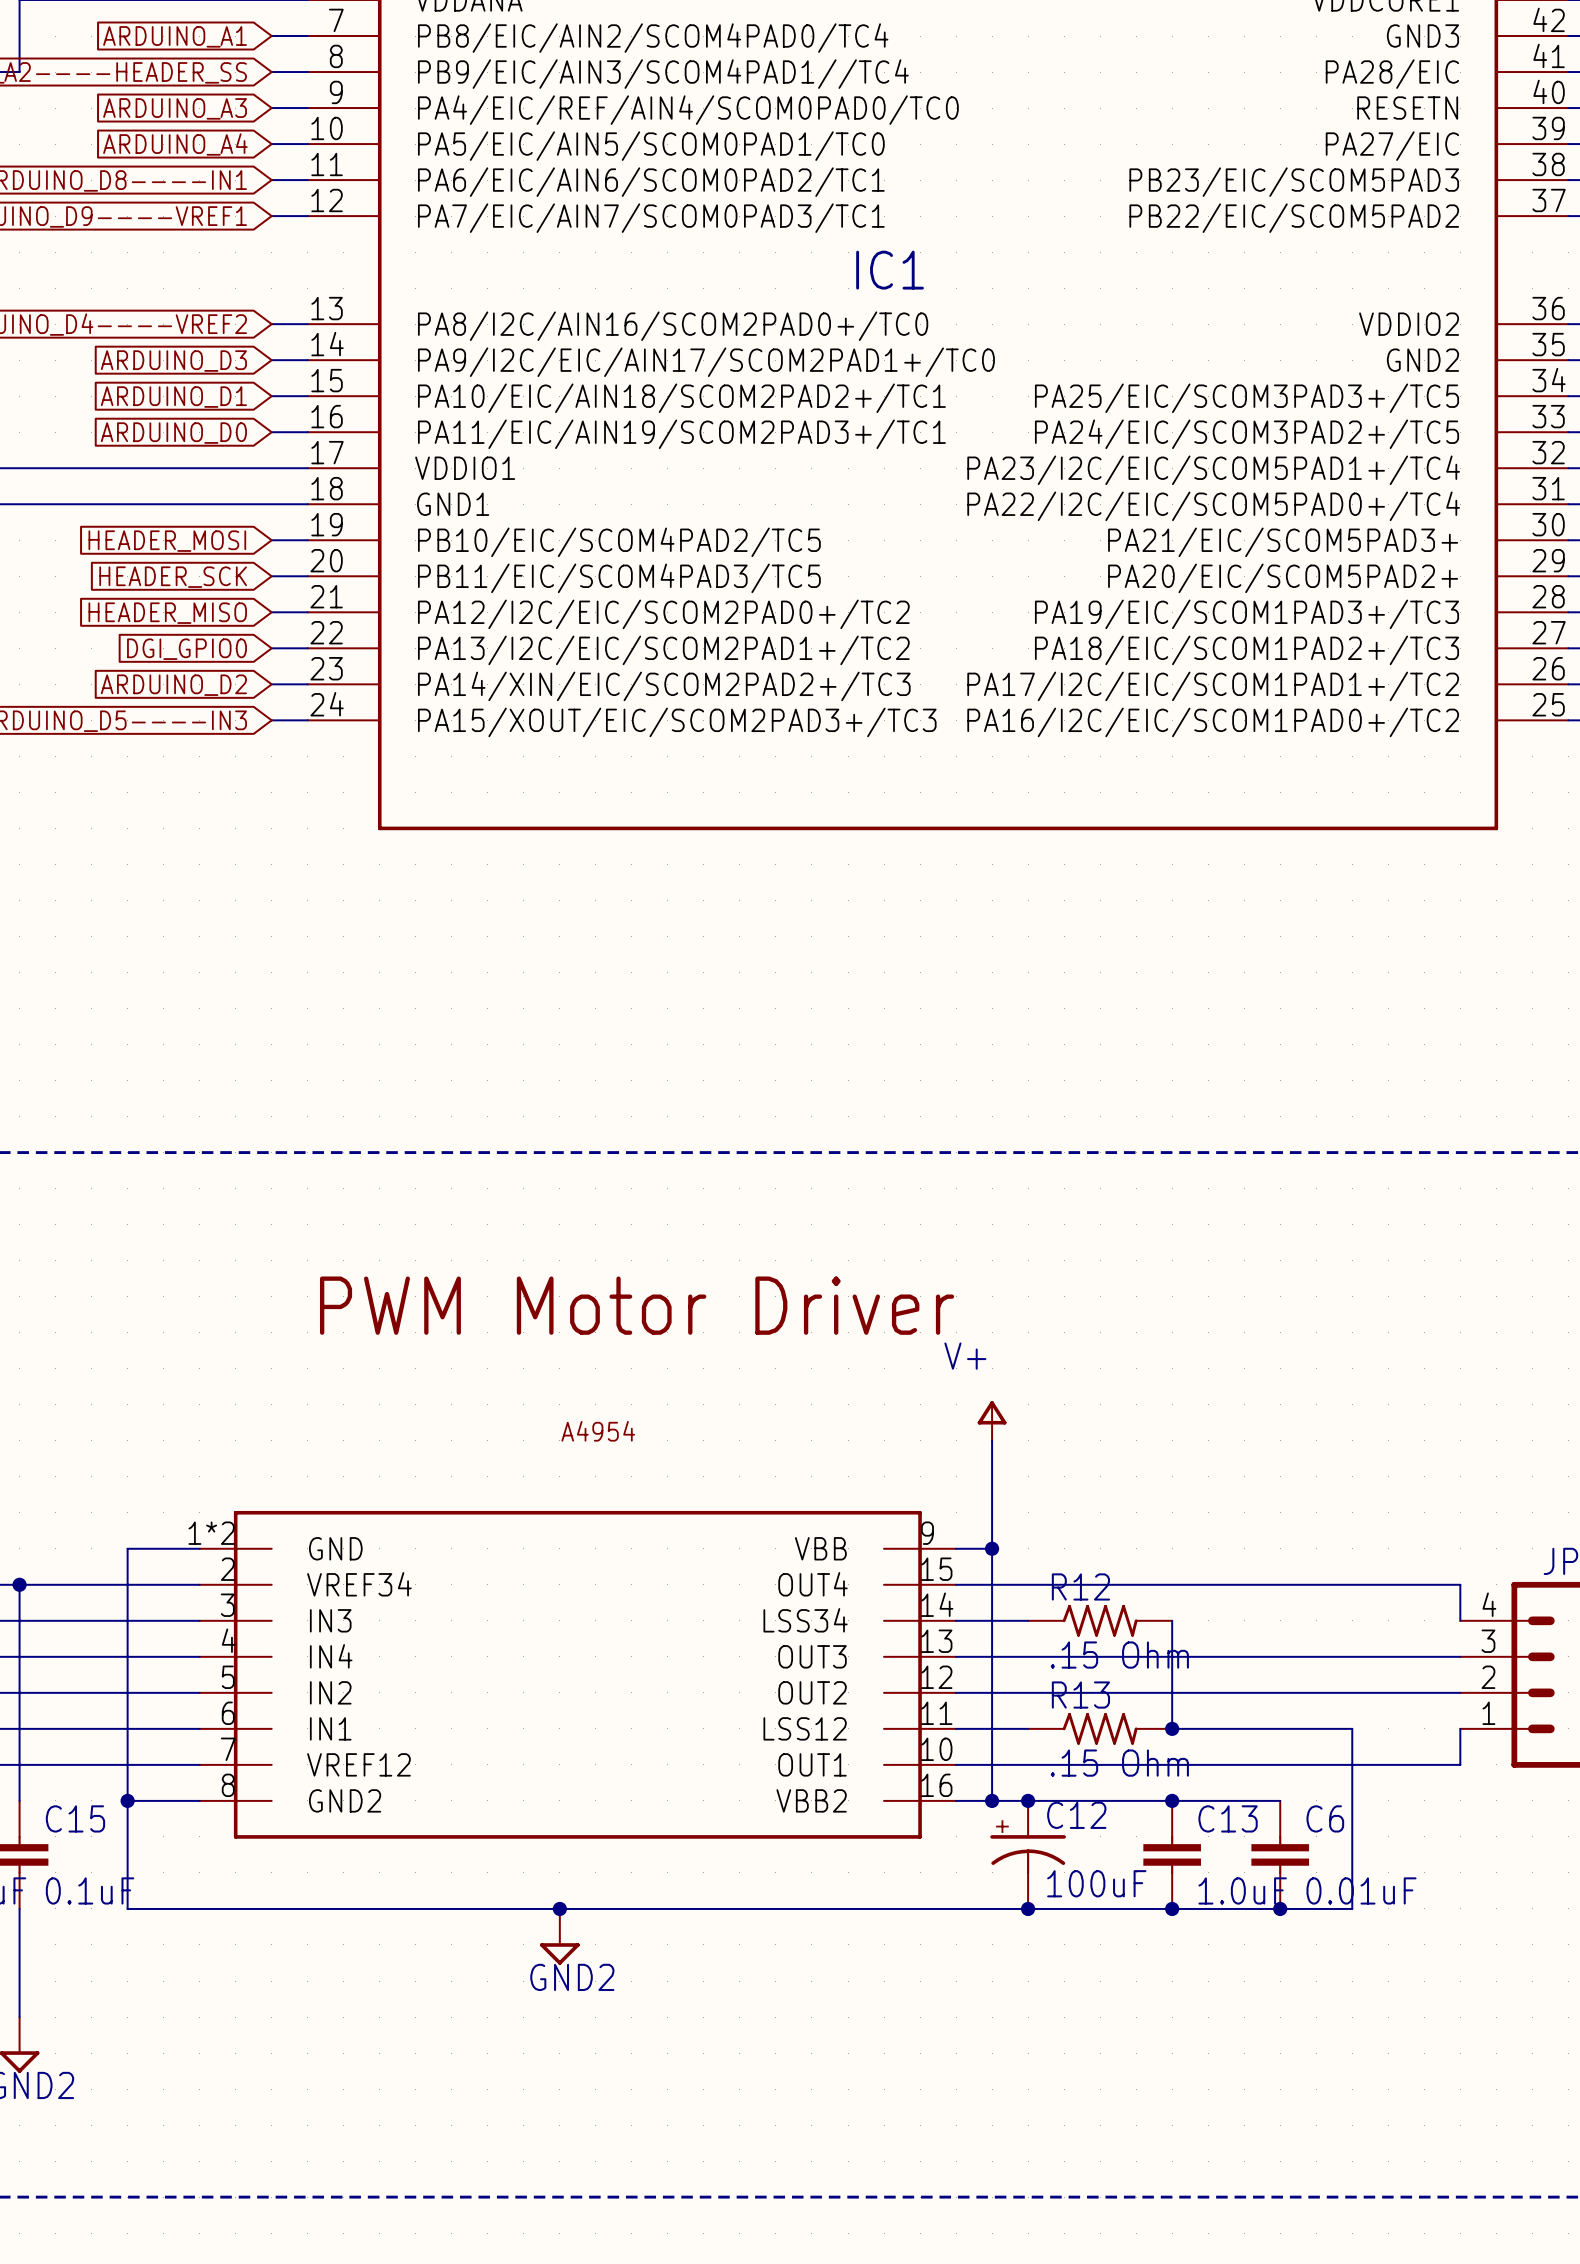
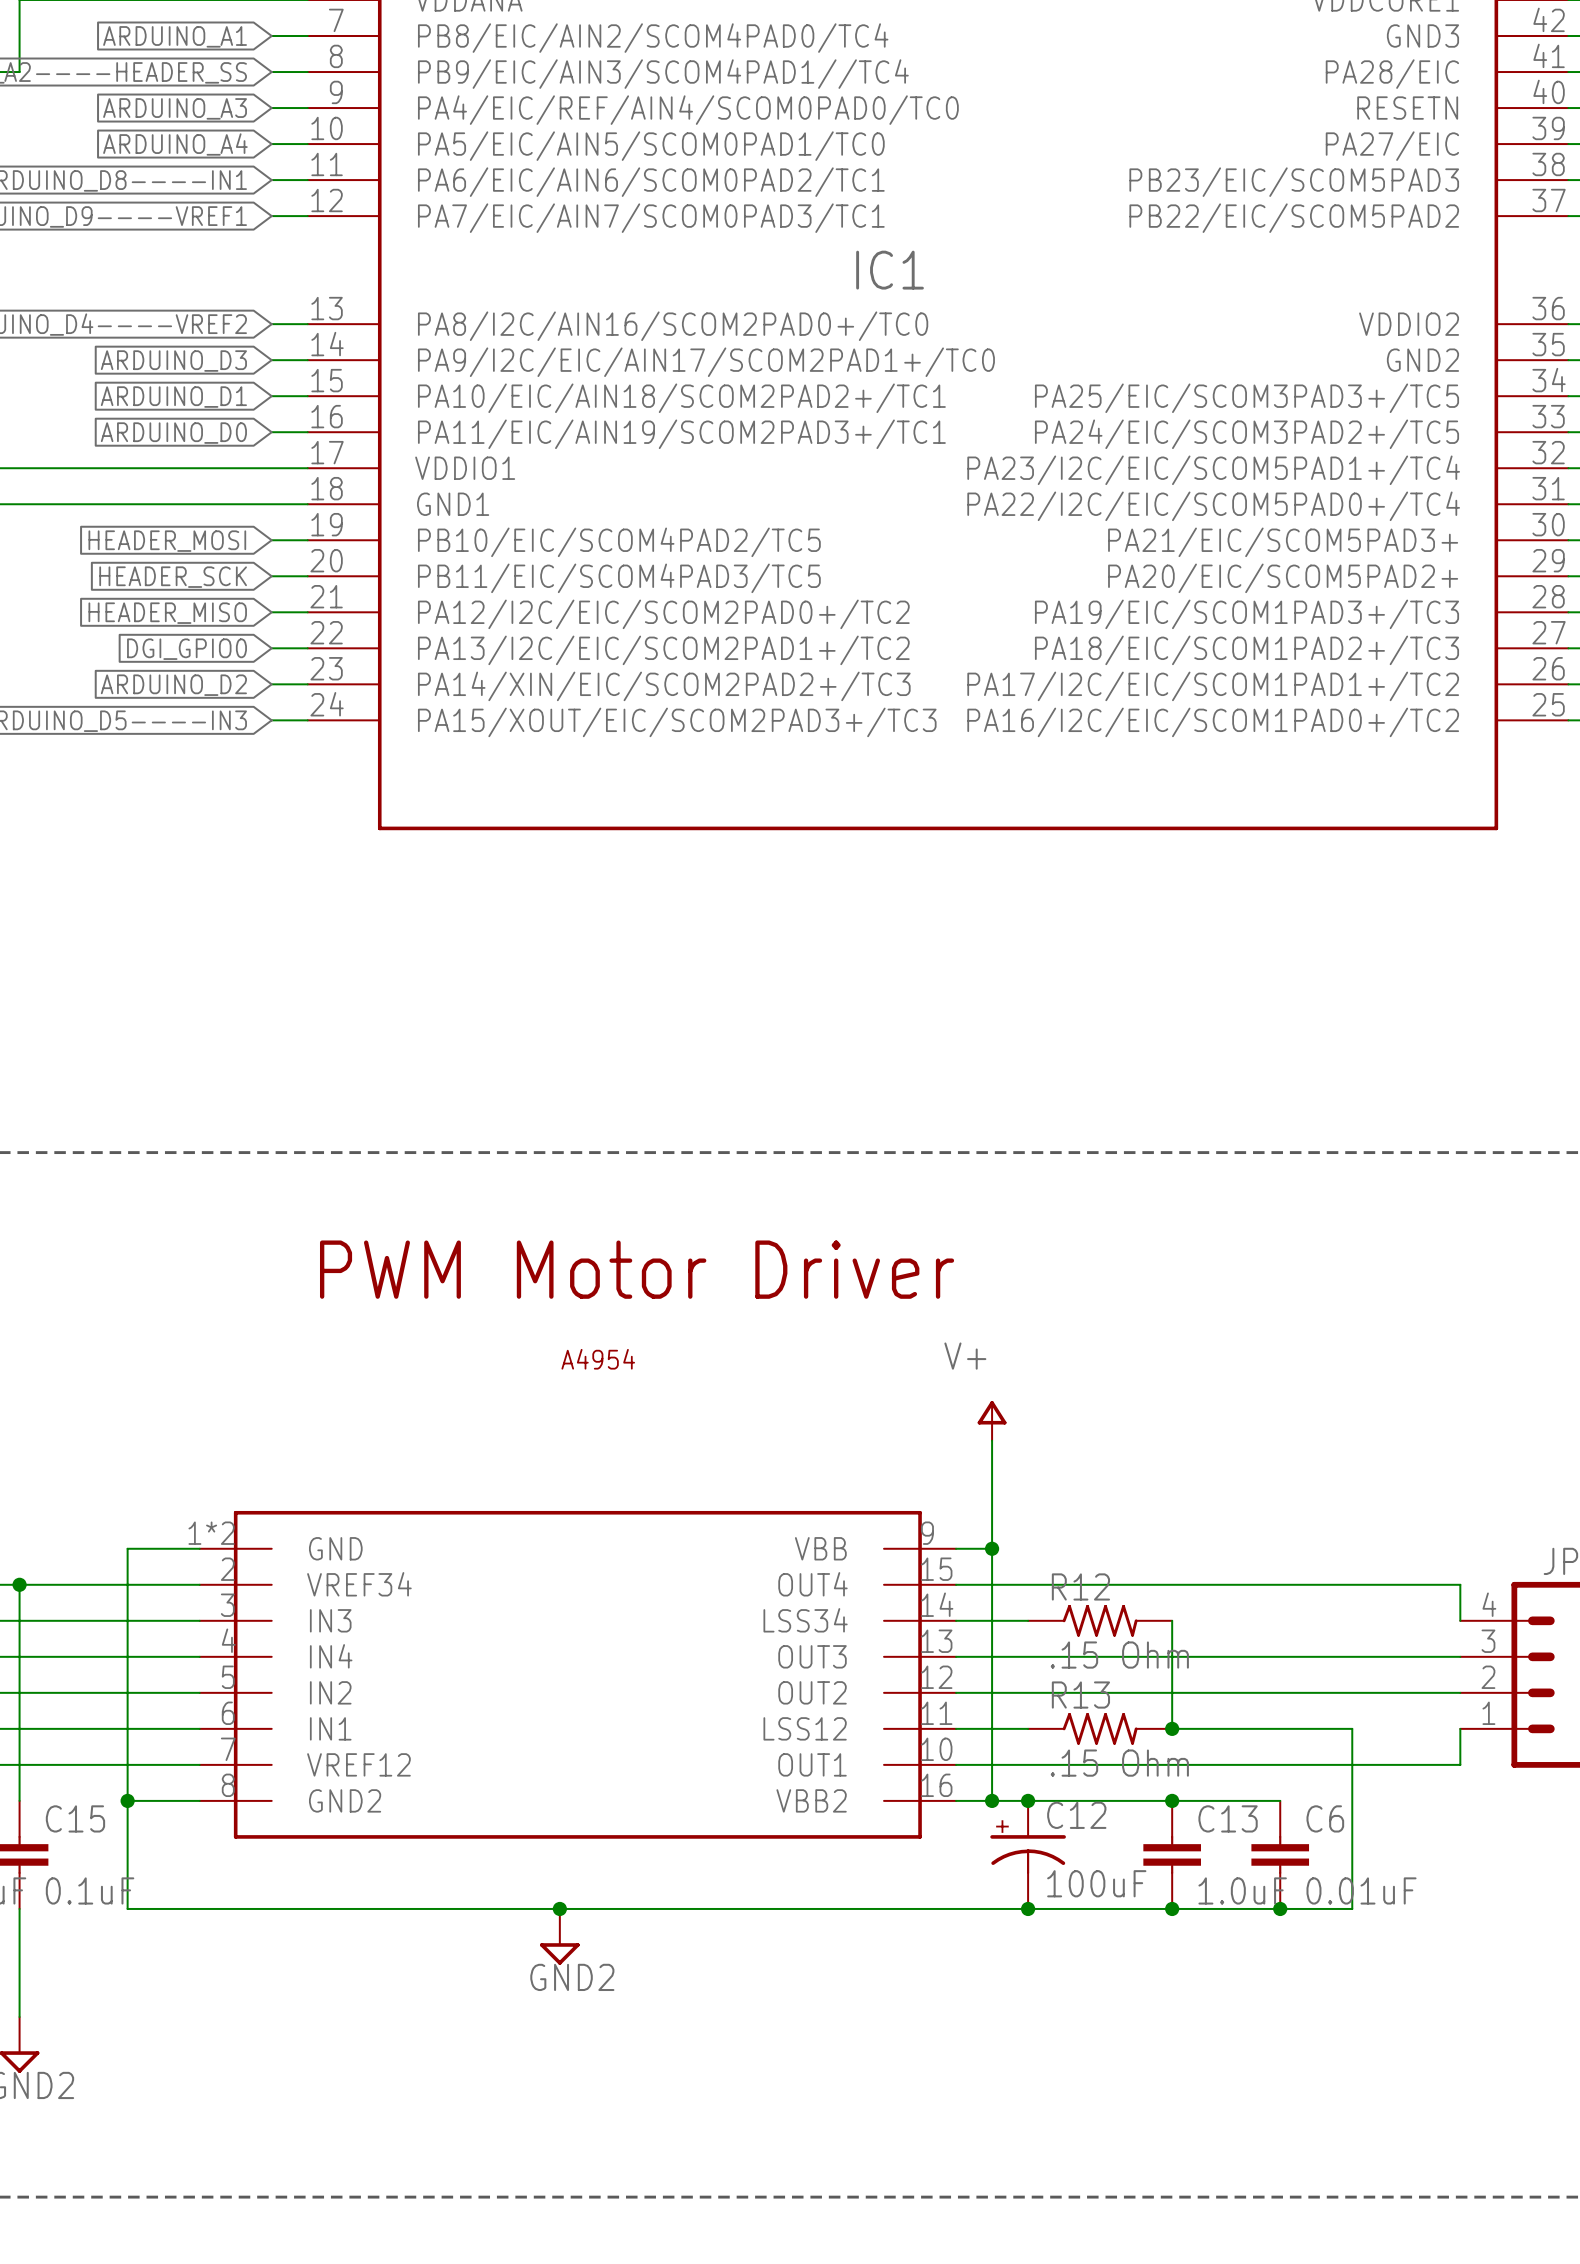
text position: PWM Motor Driver (637, 1305) -> PWM Motor Driver (637, 1269)
text position: A4954 (598, 1431) -> A4954 (598, 1359)

